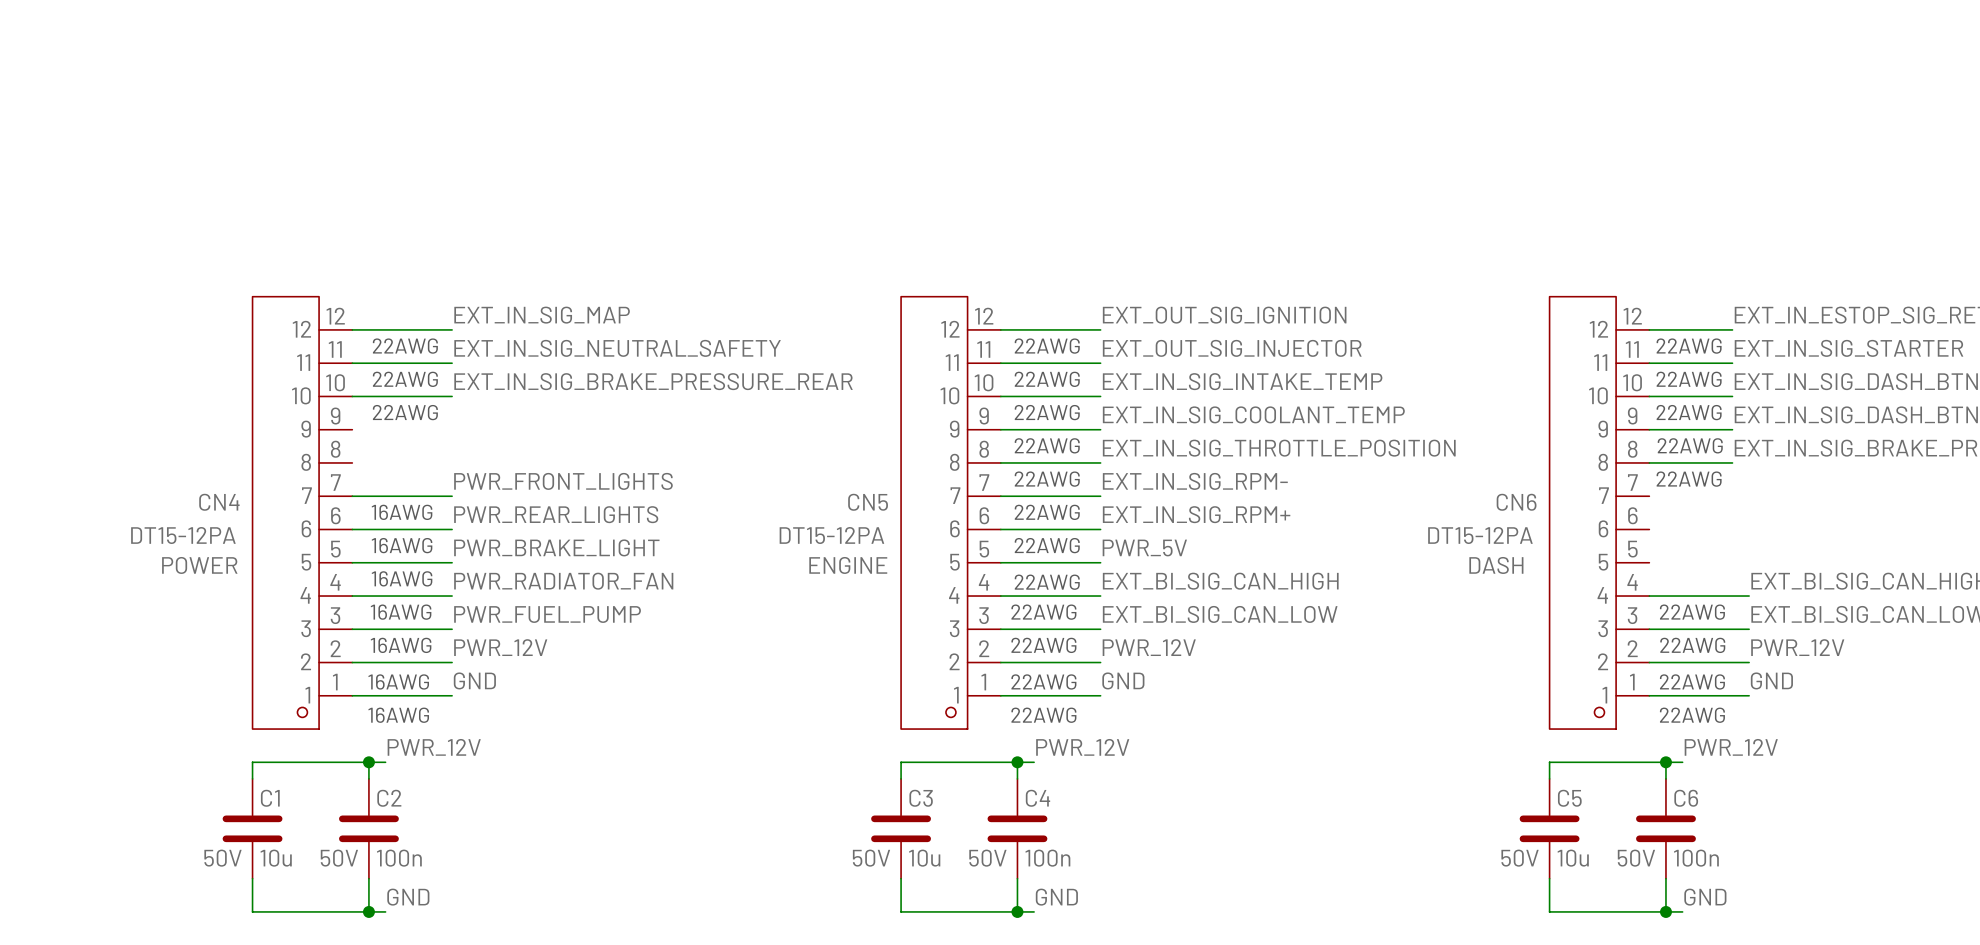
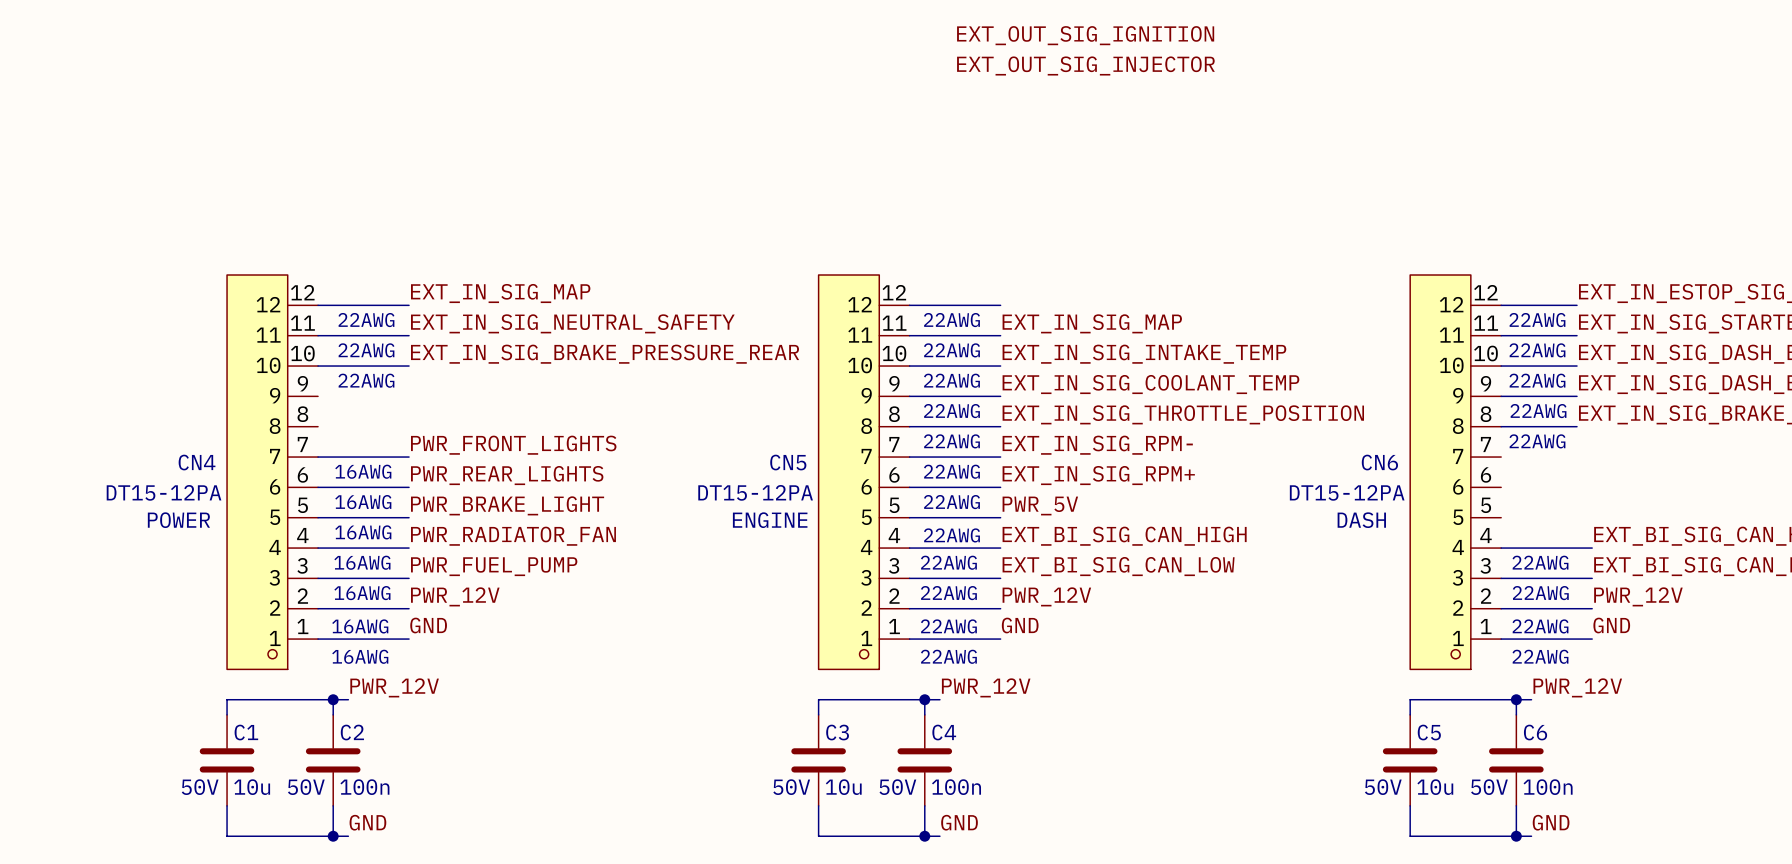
label: none -> EXT_OUT_SIG_INJECTOR (1085, 65)
label position: EXT_OUT_SIG_IGNITION (1224, 315) -> EXT_OUT_SIG_IGNITION (1085, 35)
label: EXT_OUT_SIG_INJECTOR (1232, 348) -> EXT_IN_SIG_MAP (1092, 323)

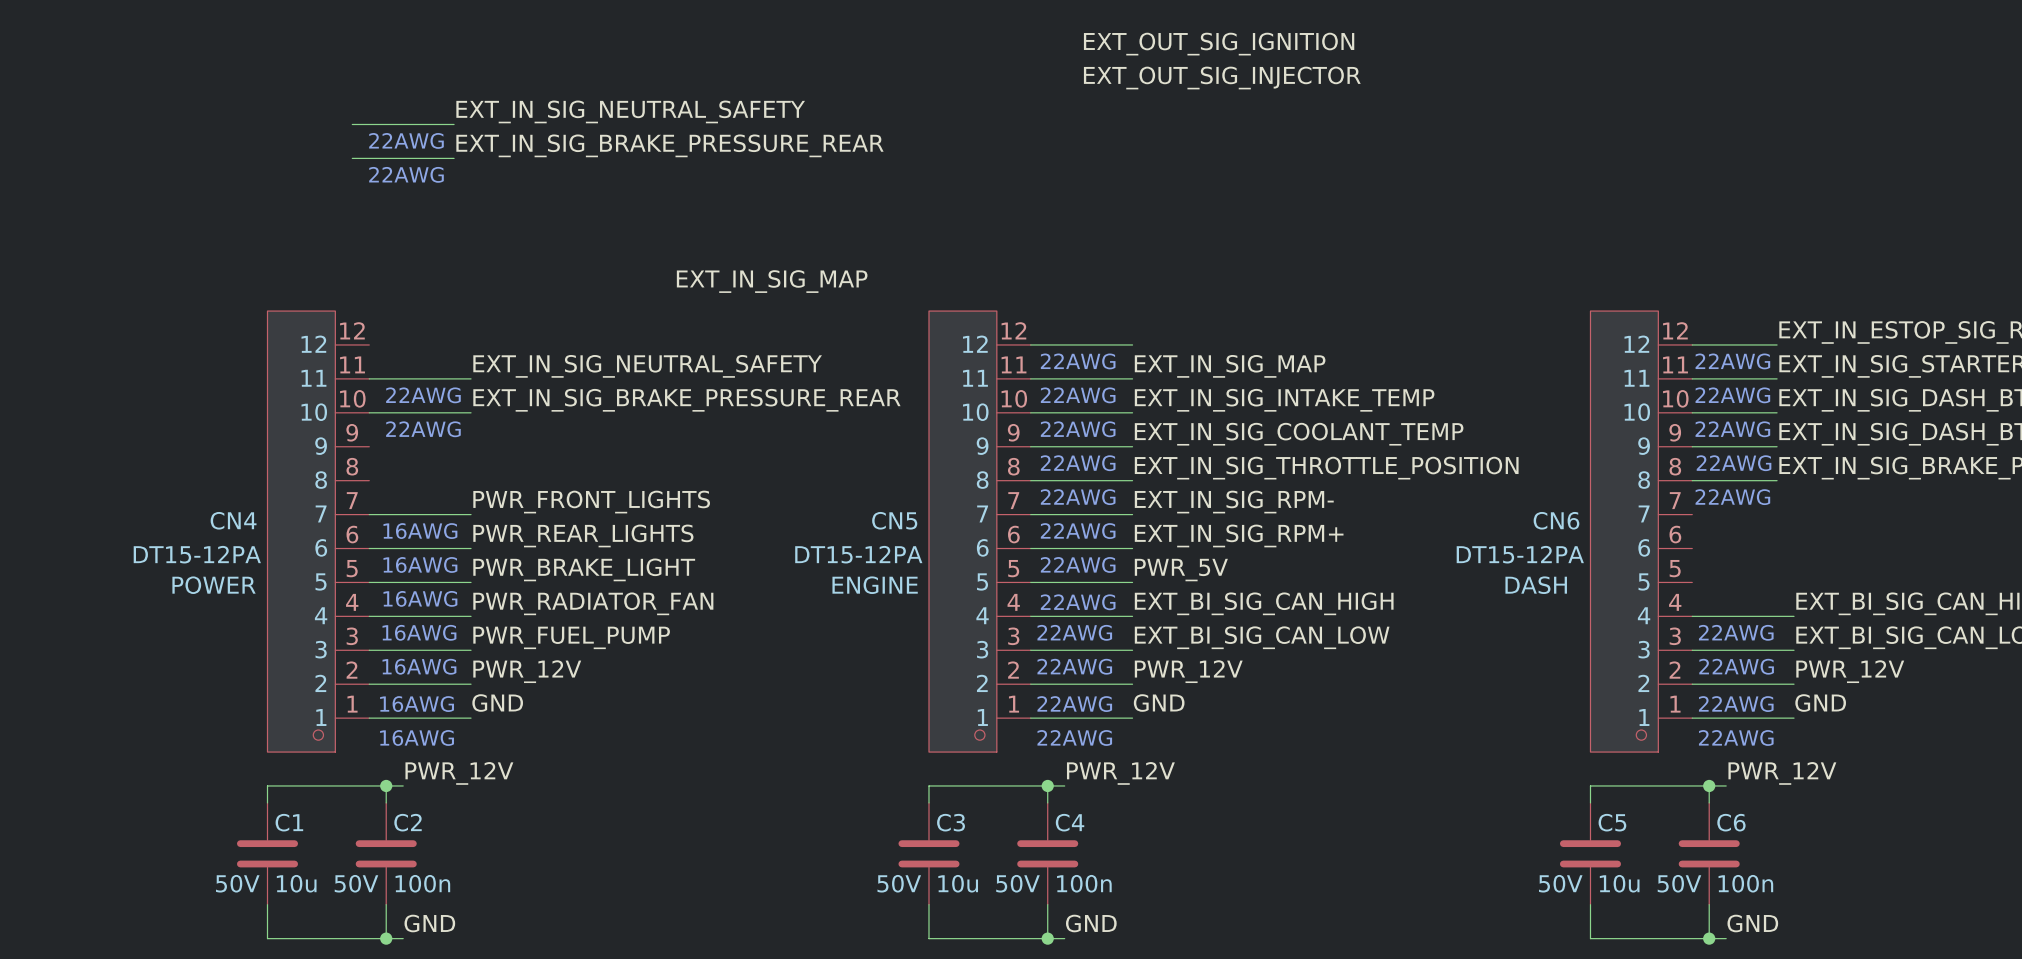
label: none -> EXT_IN_SIG_NEUTRAL_SAFETY (630, 111)
wire: none -> (352, 124) (454, 124)
text: none -> 22AWG (406, 140)
label: none -> EXT_IN_SIG_BRAKE_PRESSURE_REAR (669, 145)
text: none -> 22AWG (406, 174)
label position: EXT_IN_SIG_MAP (500, 293) -> EXT_IN_SIG_MAP (772, 281)
wire: (318, 305) (409, 305) -> (352, 158) (454, 158)
text: 22AWG (366, 320) -> none

